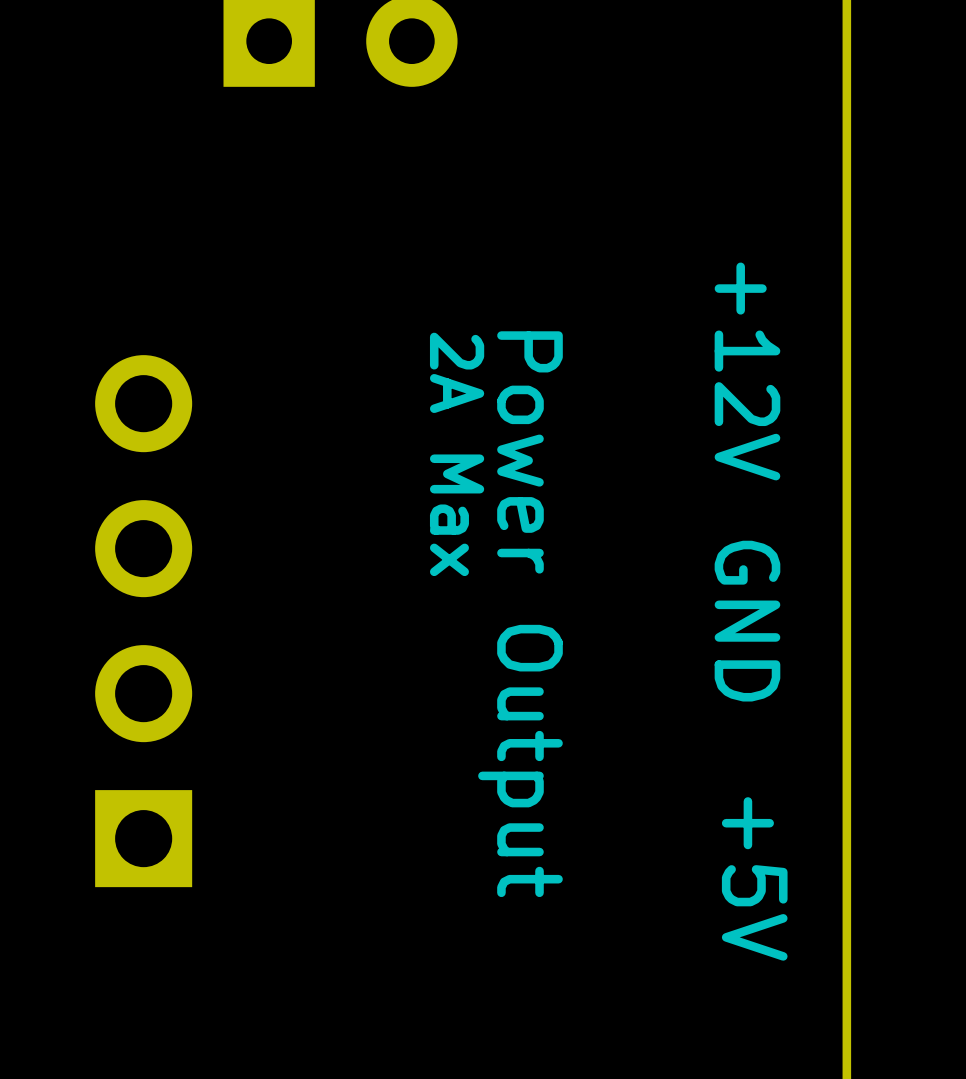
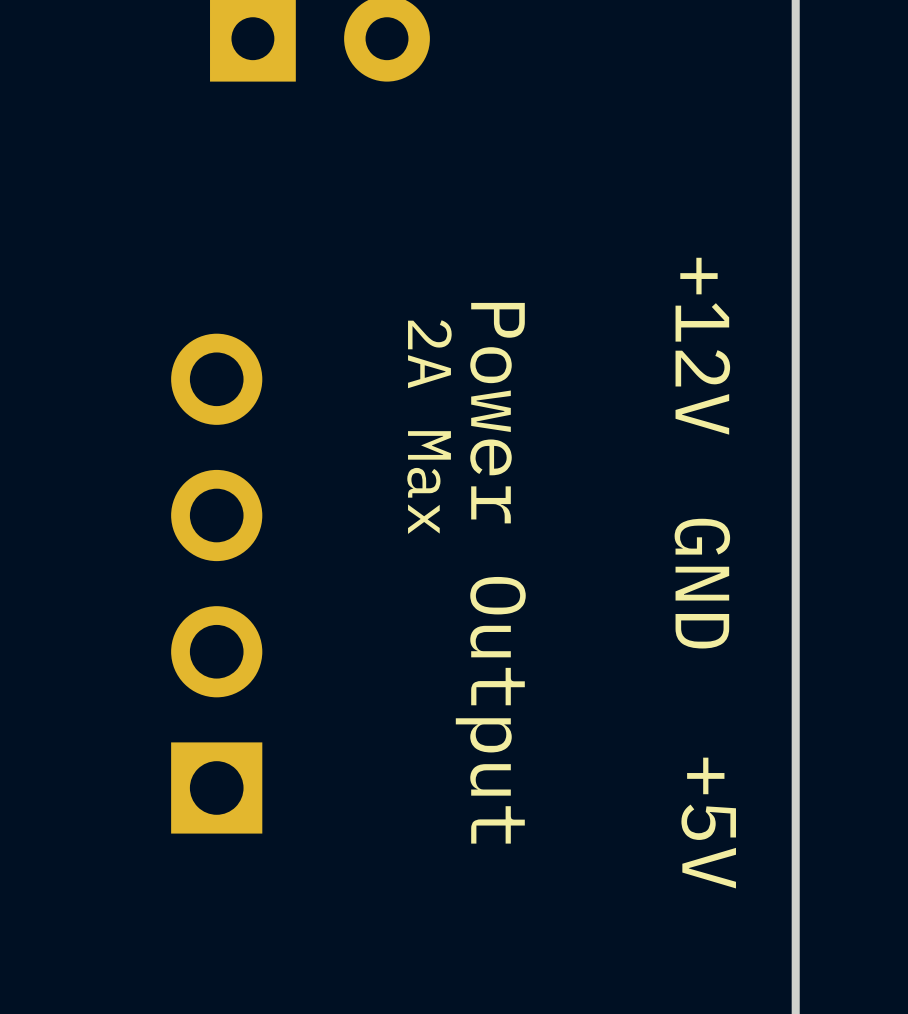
part position: (143, 621) -> (216, 583)

